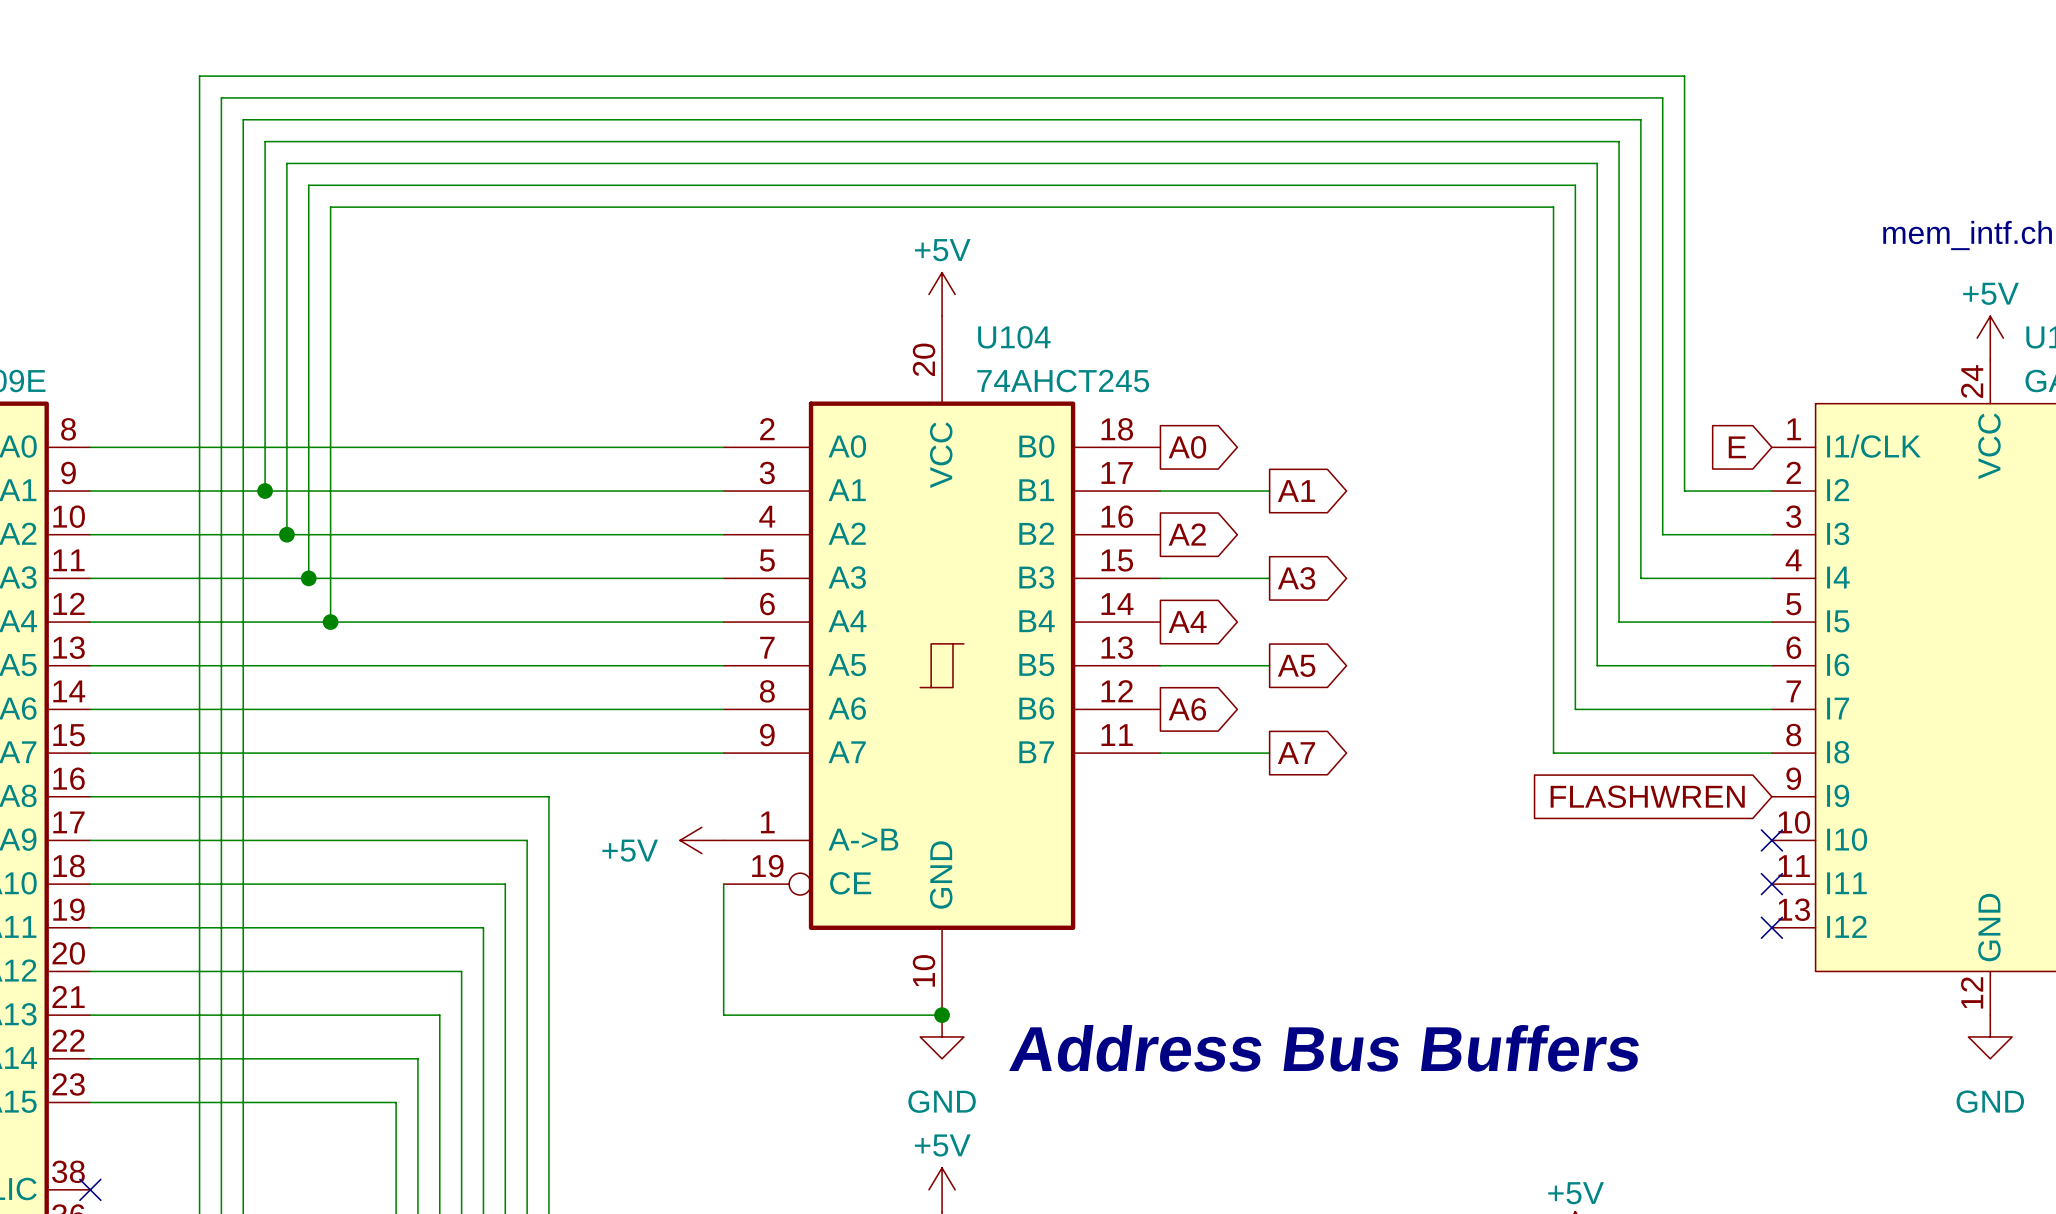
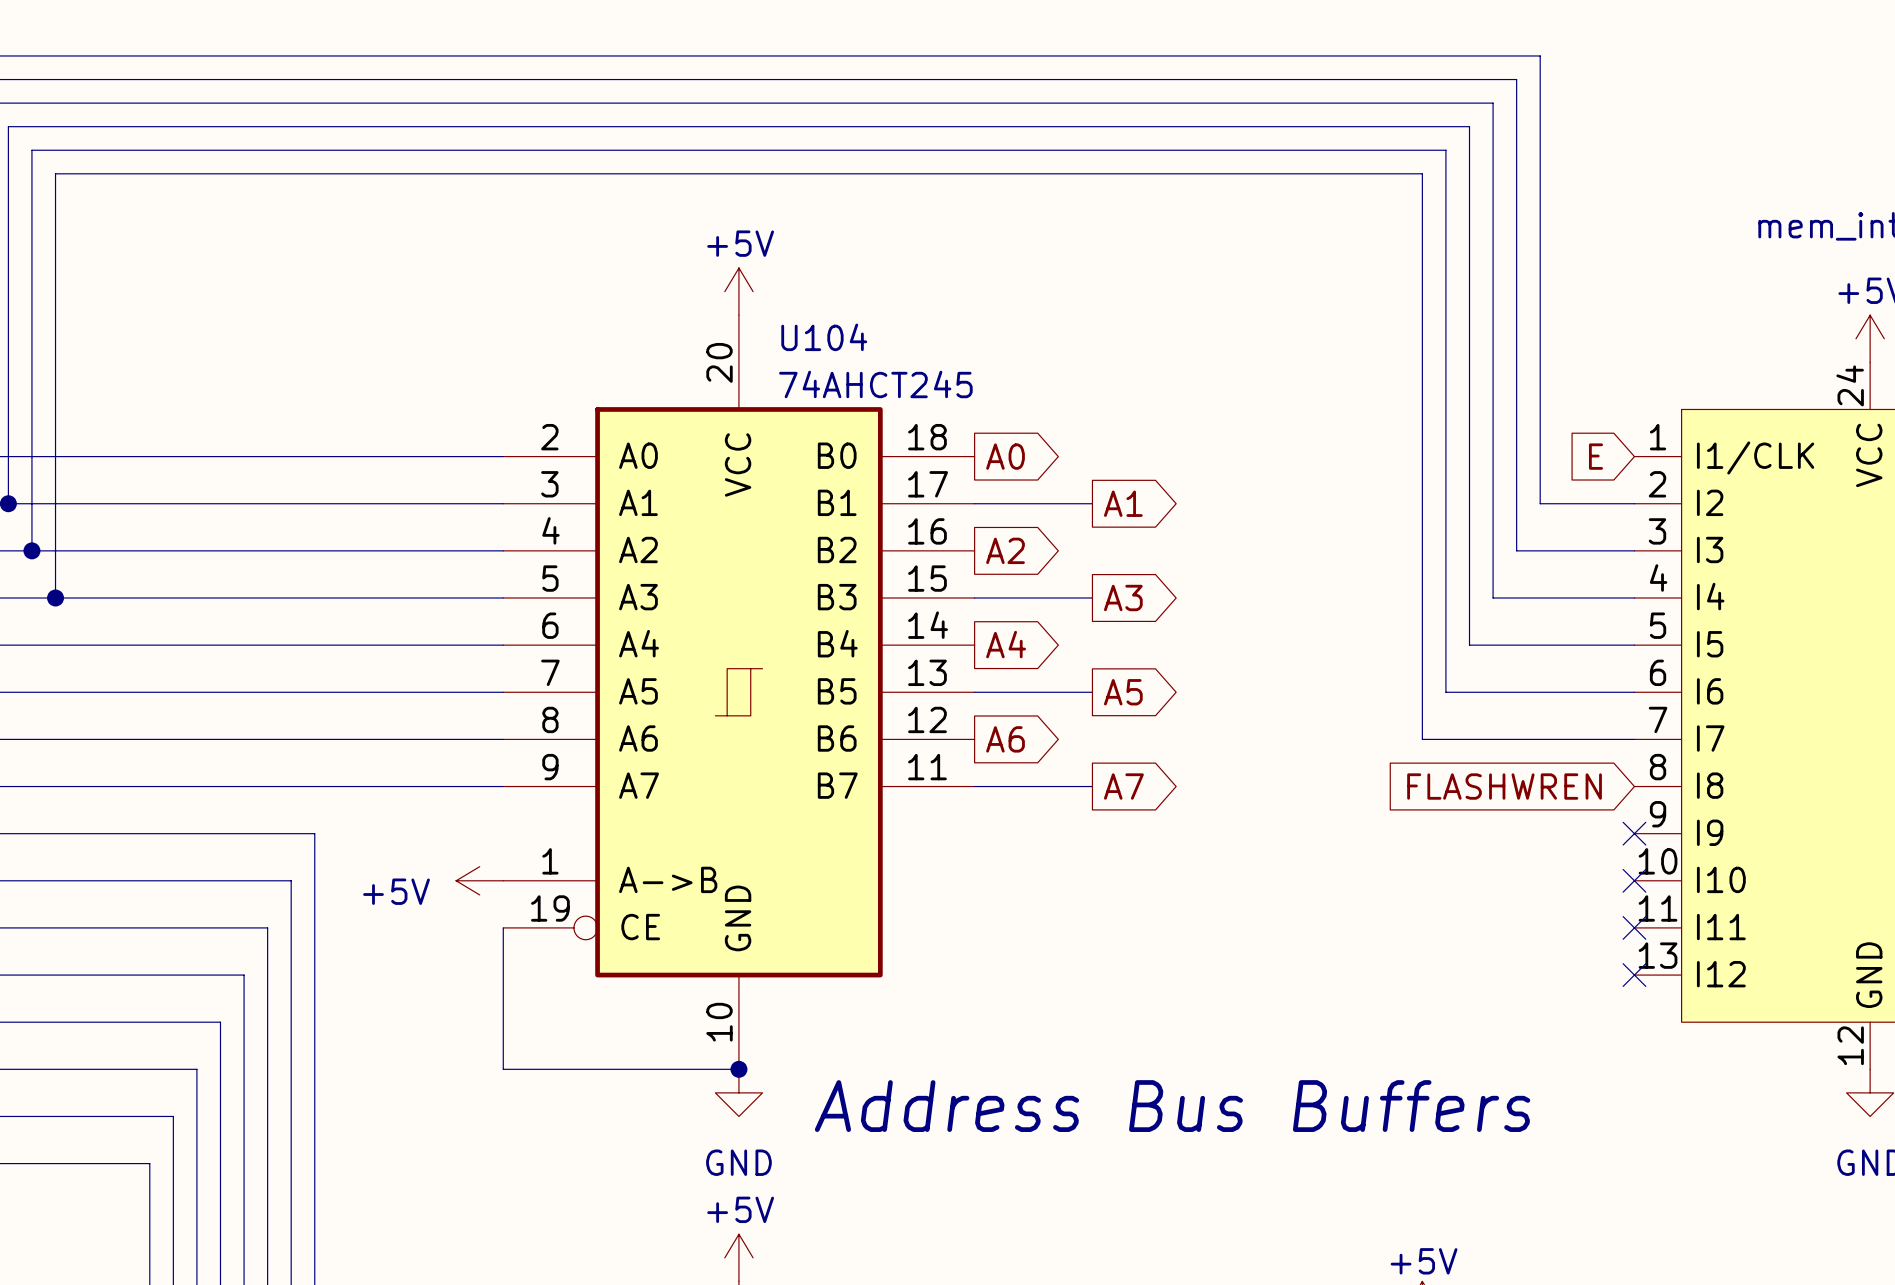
wire: (330, 622) (330, 207) (1553, 207) (1553, 753) (1771, 753) -> none
junction: (330, 622) -> none
global label position: FLASHWREN (1647, 796) -> FLASHWREN (1504, 786)
no-connect mark: none -> (1634, 833)

